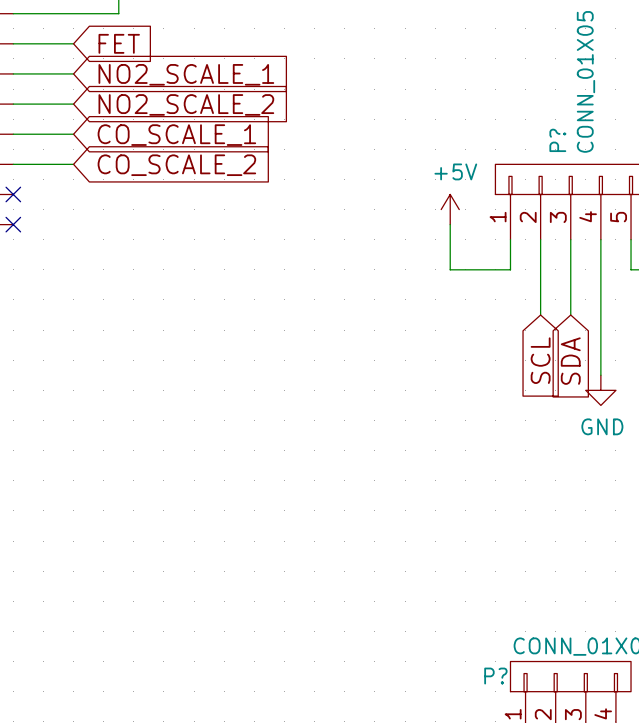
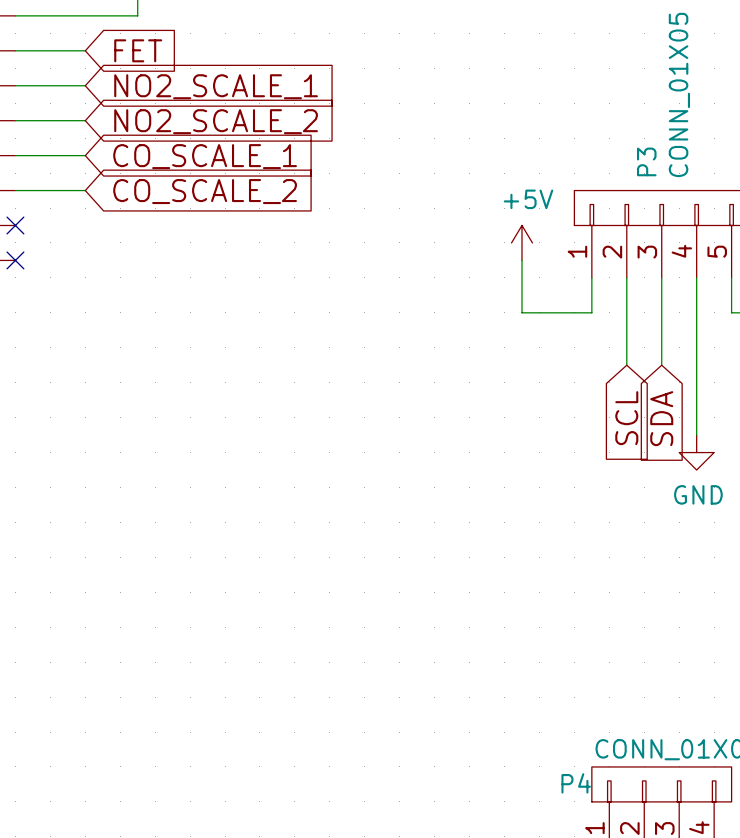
P? name: P? (557, 140) -> P3 (646, 161)
P? name: P? (495, 676) -> P4 (576, 783)

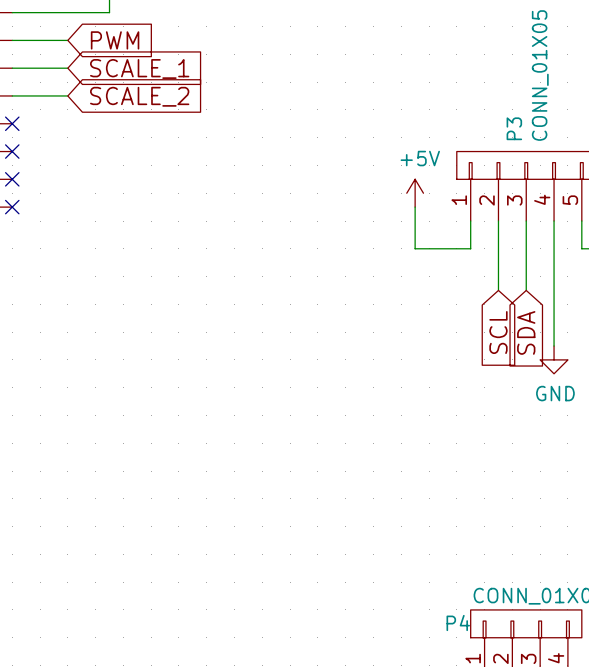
global label: FET (138, 50) -> PWM (115, 40)
global label: NO2_SCALE_1 (216, 86) -> SCALE_1 (139, 68)
global label: NO2_SCALE_2 (216, 121) -> SCALE_2 (139, 96)
wire: (15, 155) (85, 155) -> none
no-connect mark: none -> (12, 123)
global label: CO_SCALE_1 (205, 156) -> none
wire: (15, 190) (85, 190) -> none
no-connect mark: none -> (12, 151)
global label: CO_SCALE_2 (205, 191) -> none

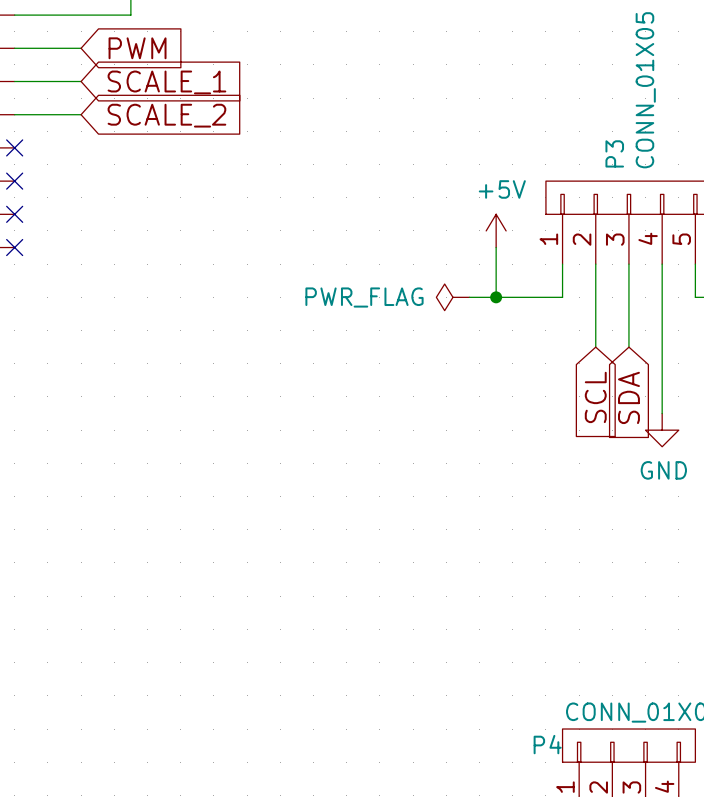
power symbol: none -> PWR_FLAG (452, 297)
wire: none -> (469, 297) (496, 297)
junction: none -> (496, 297)

